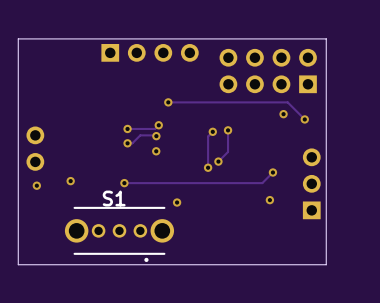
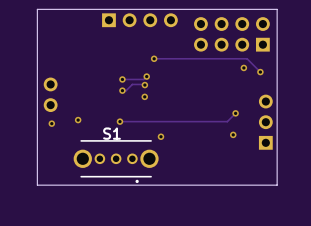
track: (228, 130) (228, 151) (218, 161) -> none
via: (228, 130) -> none
track: (212, 131) (208, 136) (208, 167) -> none
via: (212, 131) -> none
via: (218, 161) -> none
via: (208, 167) -> none

